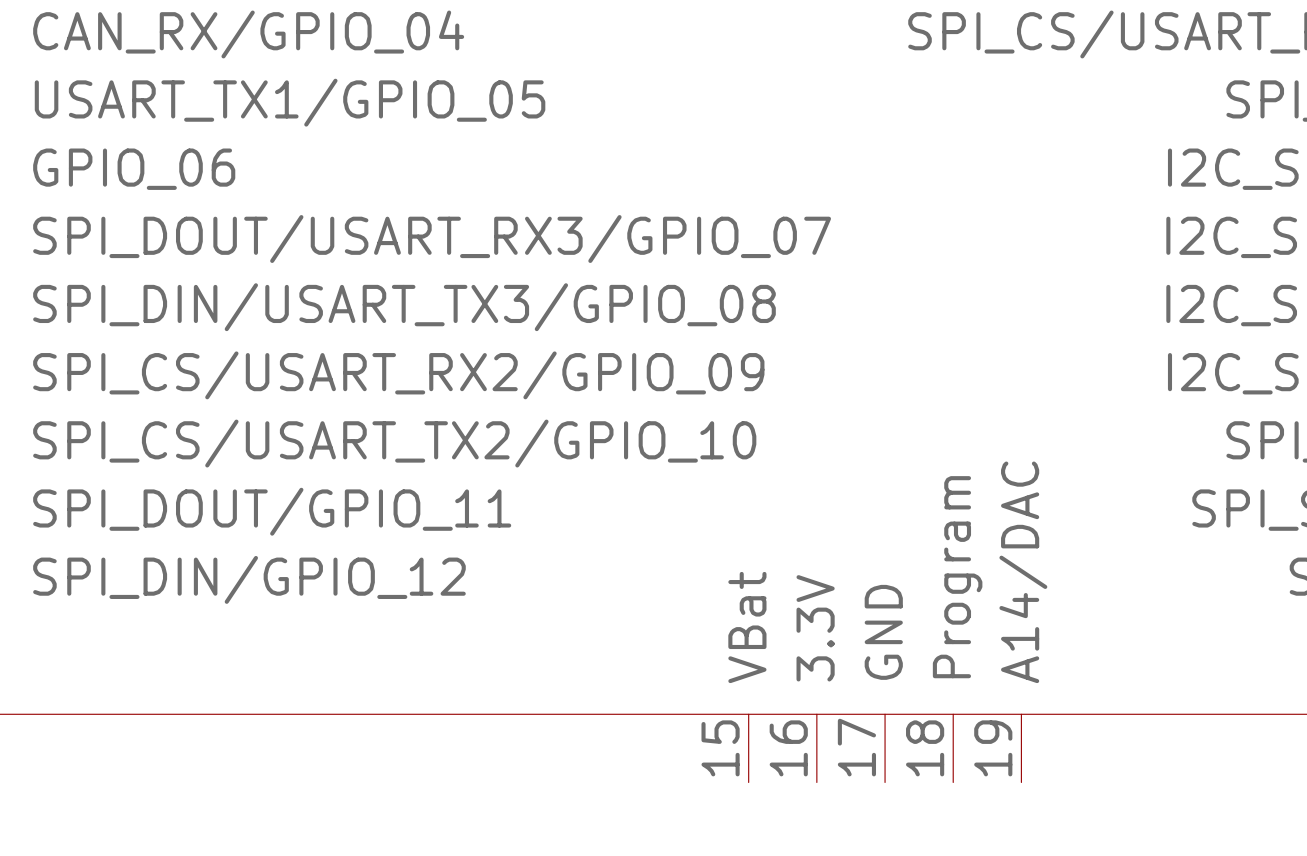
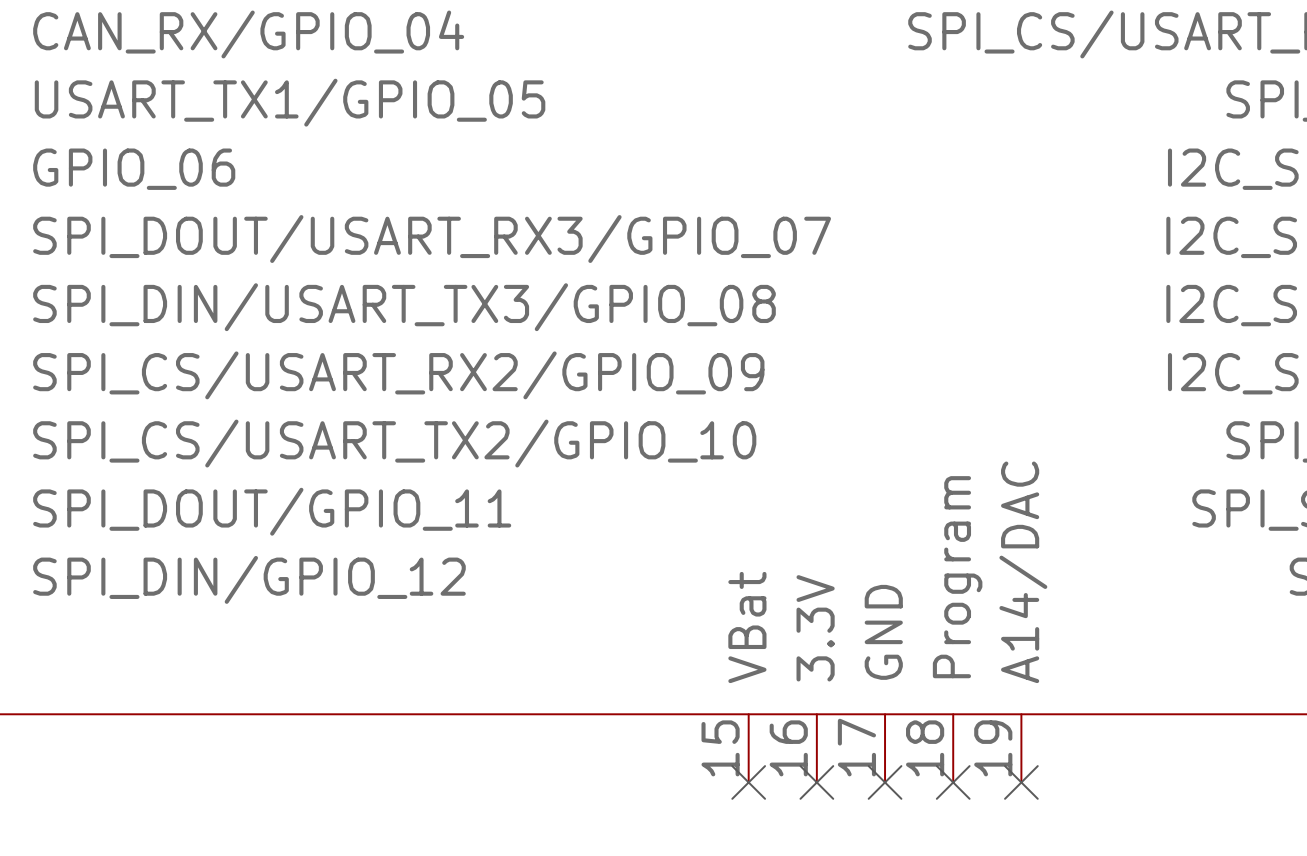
no-connect mark: none -> (748, 782)
no-connect mark: none -> (816, 782)
no-connect mark: none -> (885, 782)
no-connect mark: none -> (953, 782)
no-connect mark: none -> (1021, 782)

